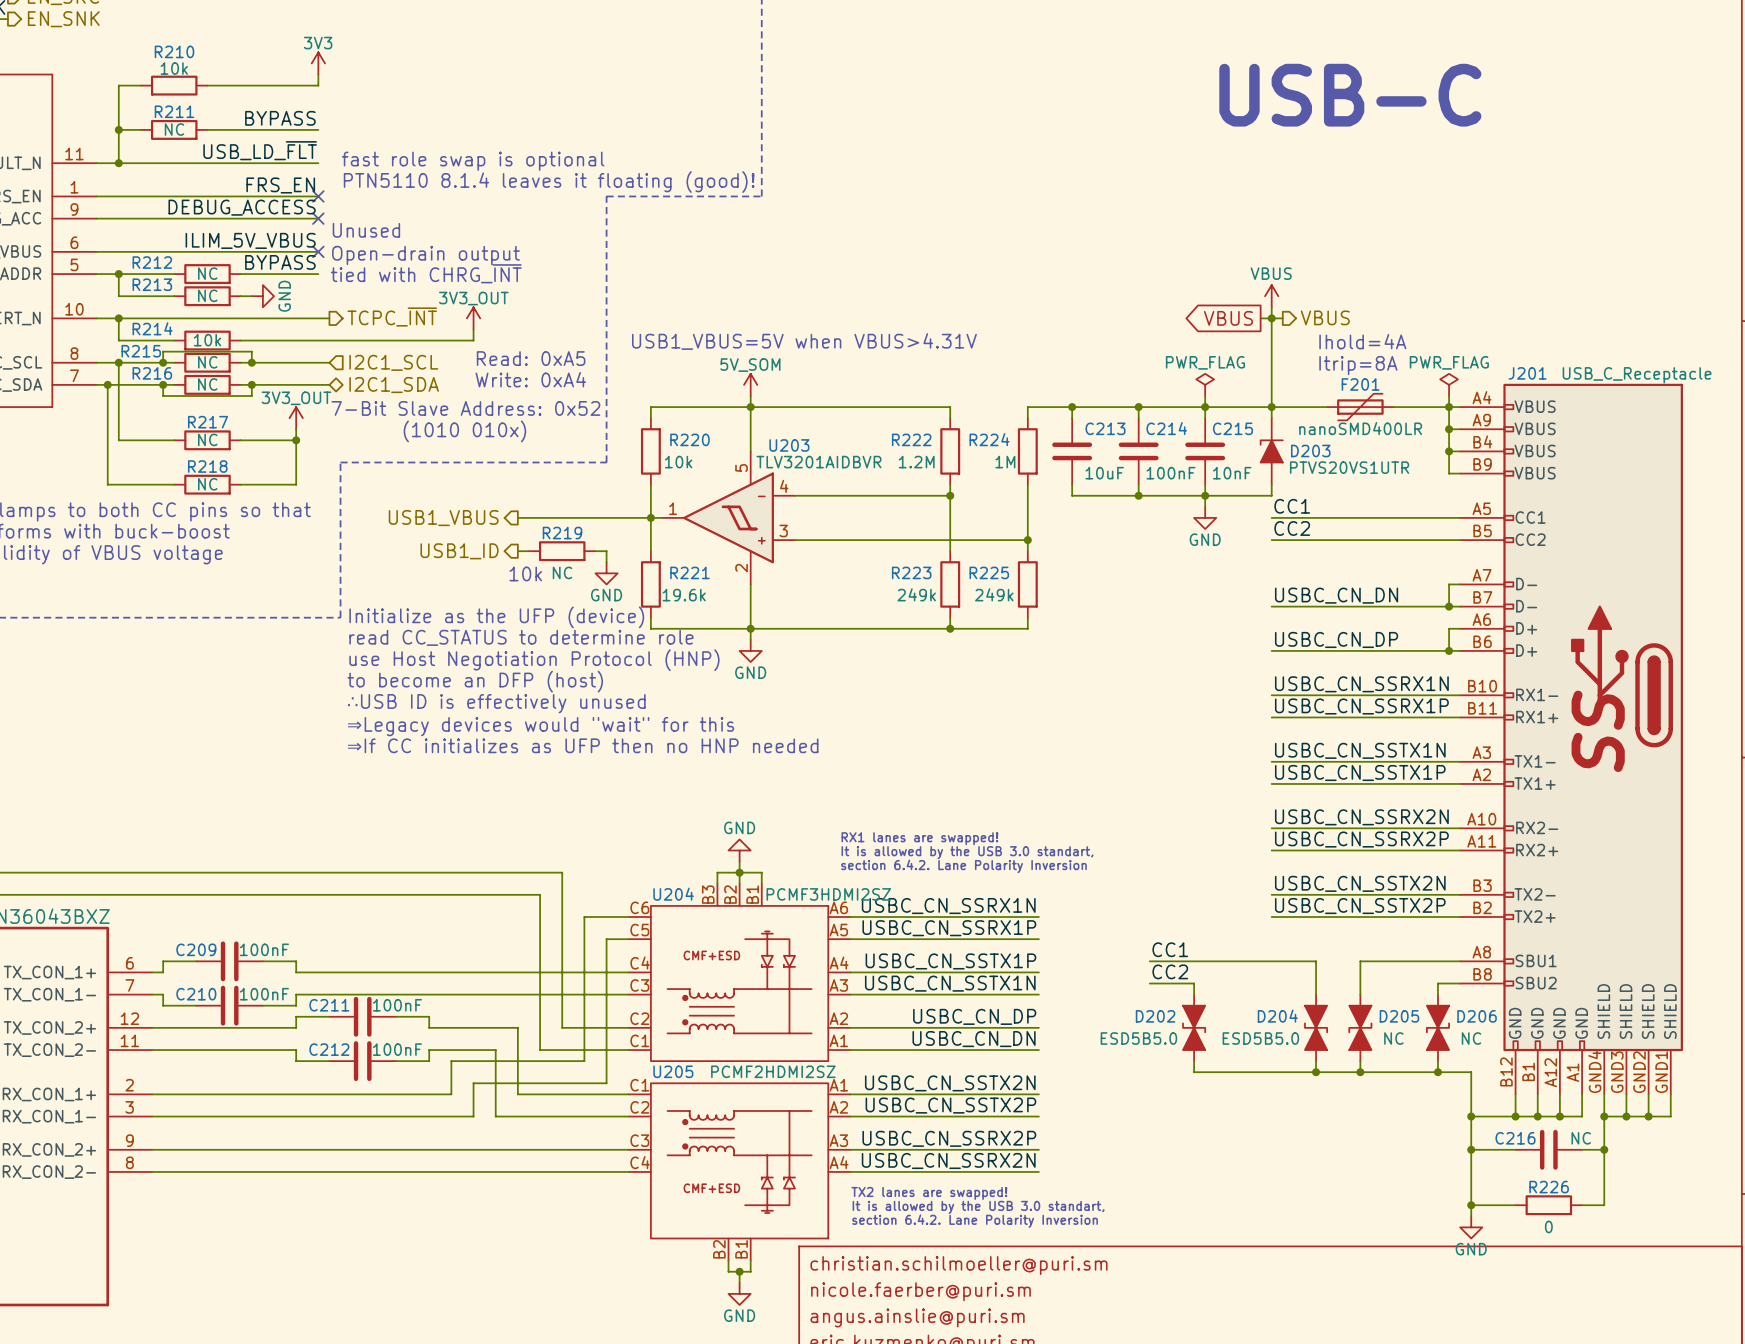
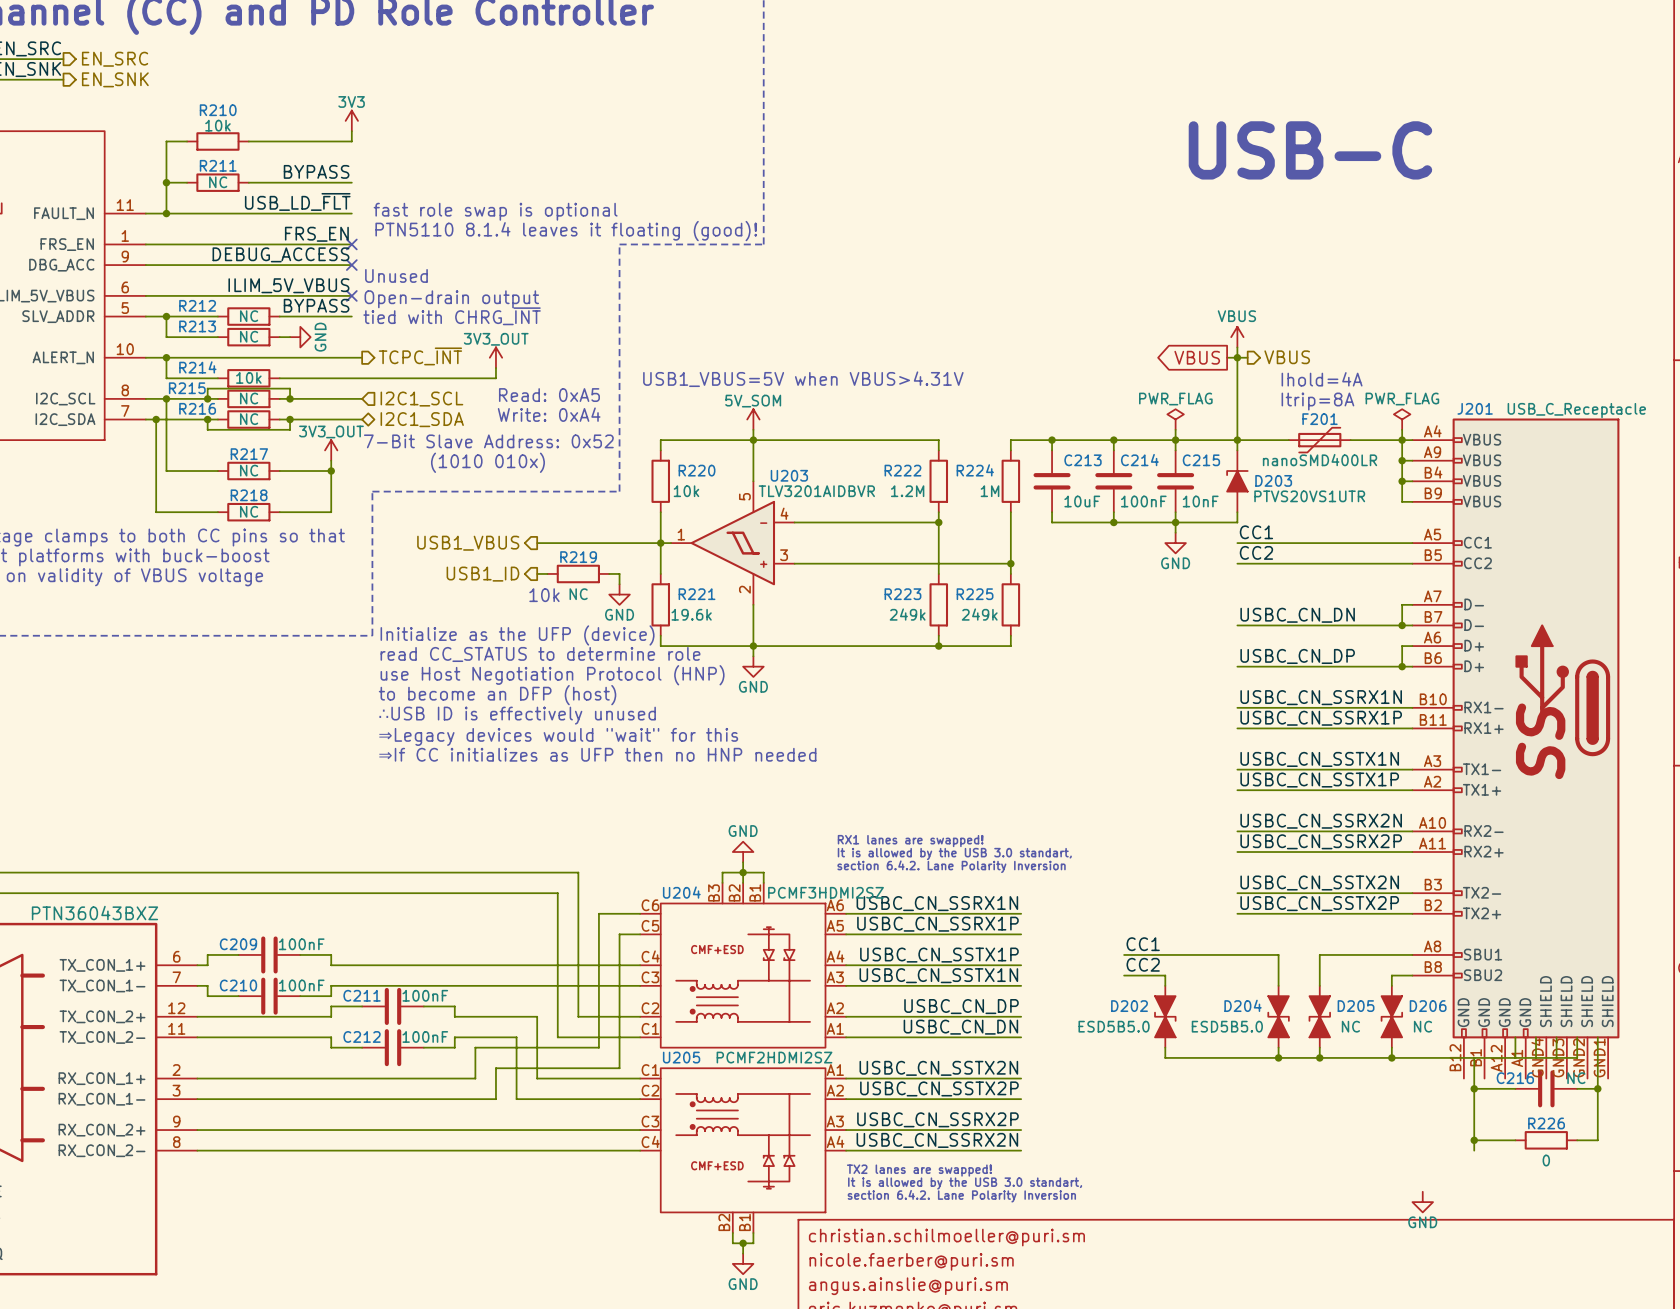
wire: (1471, 1072) (1471, 1216) -> (1422, 1057) (1577, 1057) (1577, 1037)
wire: none -> (1474, 1057) (1474, 1150)
wire: (1515, 1094) (1515, 1116) -> (1515, 1037) (1515, 1057)
wire: (1537, 1094) (1537, 1116) -> (1536, 1037) (1536, 1057)
wire: (1559, 1094) (1559, 1116) -> (1556, 1037) (1556, 1057)
wire: (1582, 1094) (1582, 1116) (1471, 1116) -> none
wire: (1604, 1094) (1604, 1205) (1582, 1205) -> (1597, 1037) (1597, 1140) (1577, 1140)
wire: (1626, 1094) (1626, 1116) -> none
wire: (1648, 1094) (1648, 1116) -> none
wire: (1670, 1094) (1670, 1116) (1604, 1116) -> none
junction: none -> (1474, 1088)
junction: (1471, 1116) -> none
junction: (1515, 1116) -> none
junction: (1537, 1116) -> none
junction: (1559, 1116) -> none
junction: (1604, 1116) -> none
junction: (1626, 1116) -> none
junction position: (1648, 1116) -> (1597, 1088)
wire: (1471, 1149) (1515, 1149) -> (1474, 1088) (1515, 1088)
junction: (1471, 1149) -> none
C216 position: (1548, 1149) -> (1546, 1088)
wire: (1582, 1149) (1604, 1149) -> (1577, 1088) (1597, 1088)
junction: (1604, 1149) -> none
junction: none -> (1474, 1140)
wire: (1471, 1205) (1515, 1205) -> (1474, 1140) (1515, 1140)
junction: (1471, 1205) -> none
R226 position: (1548, 1205) -> (1546, 1140)

